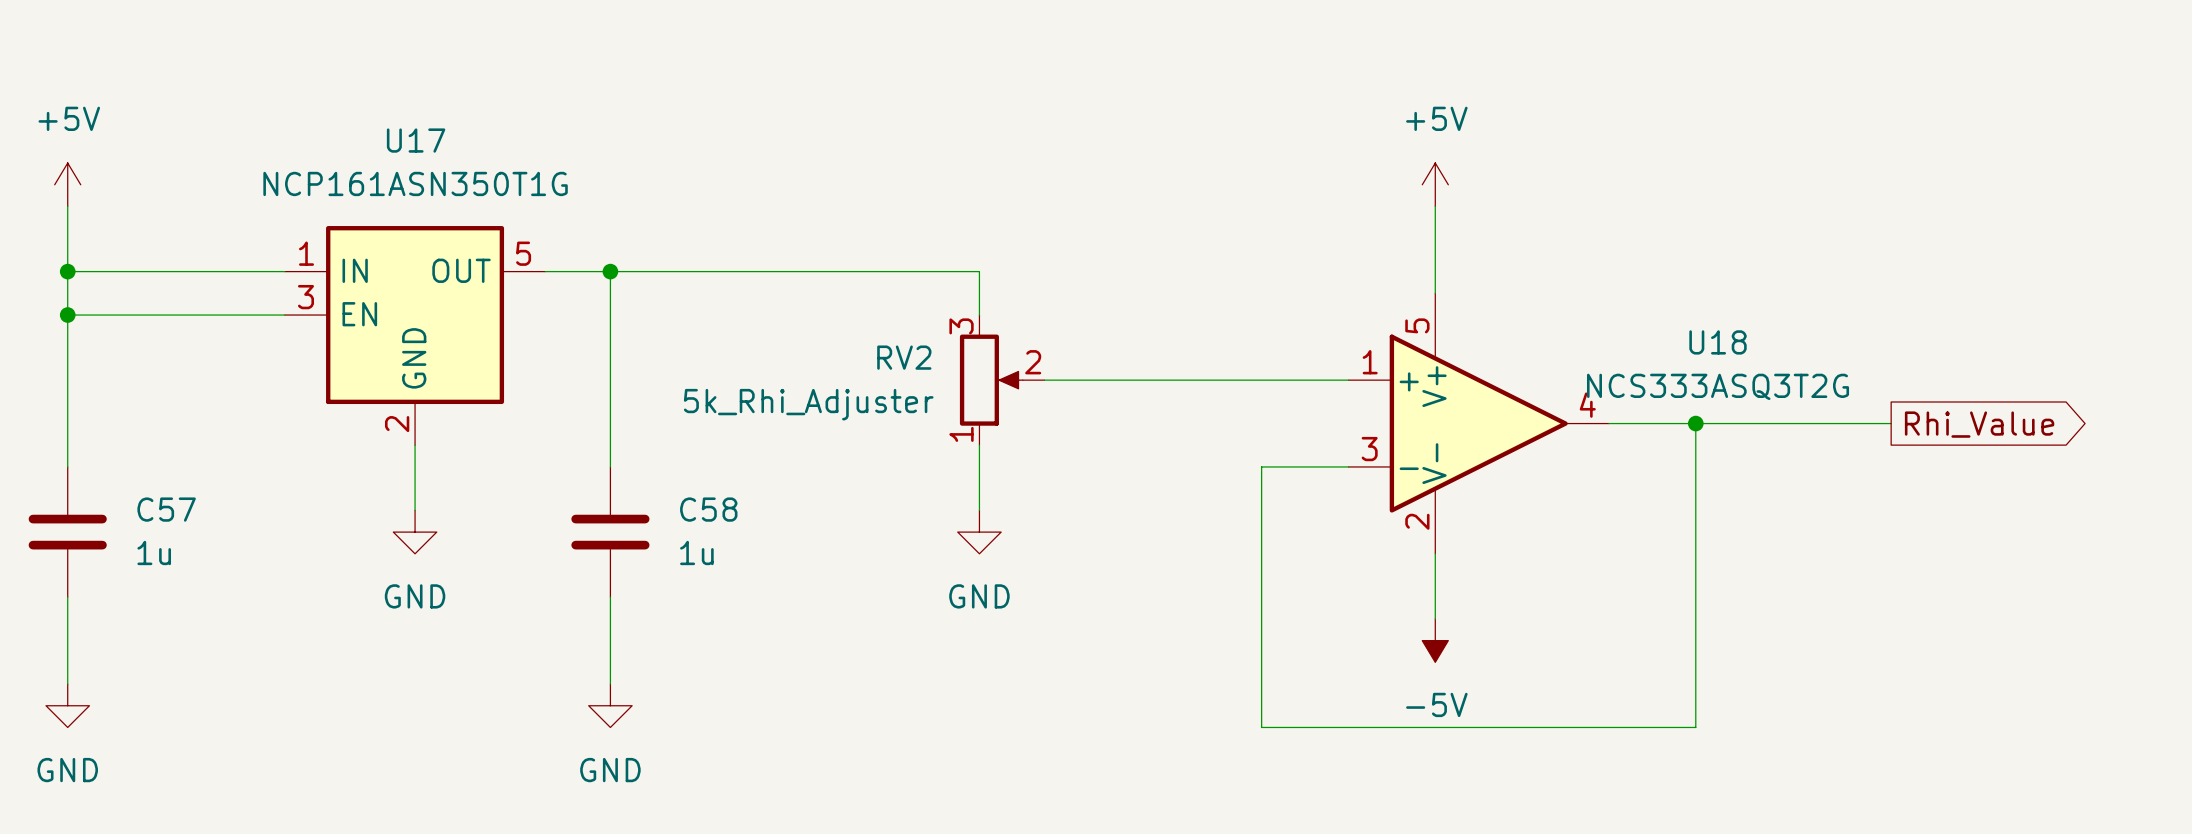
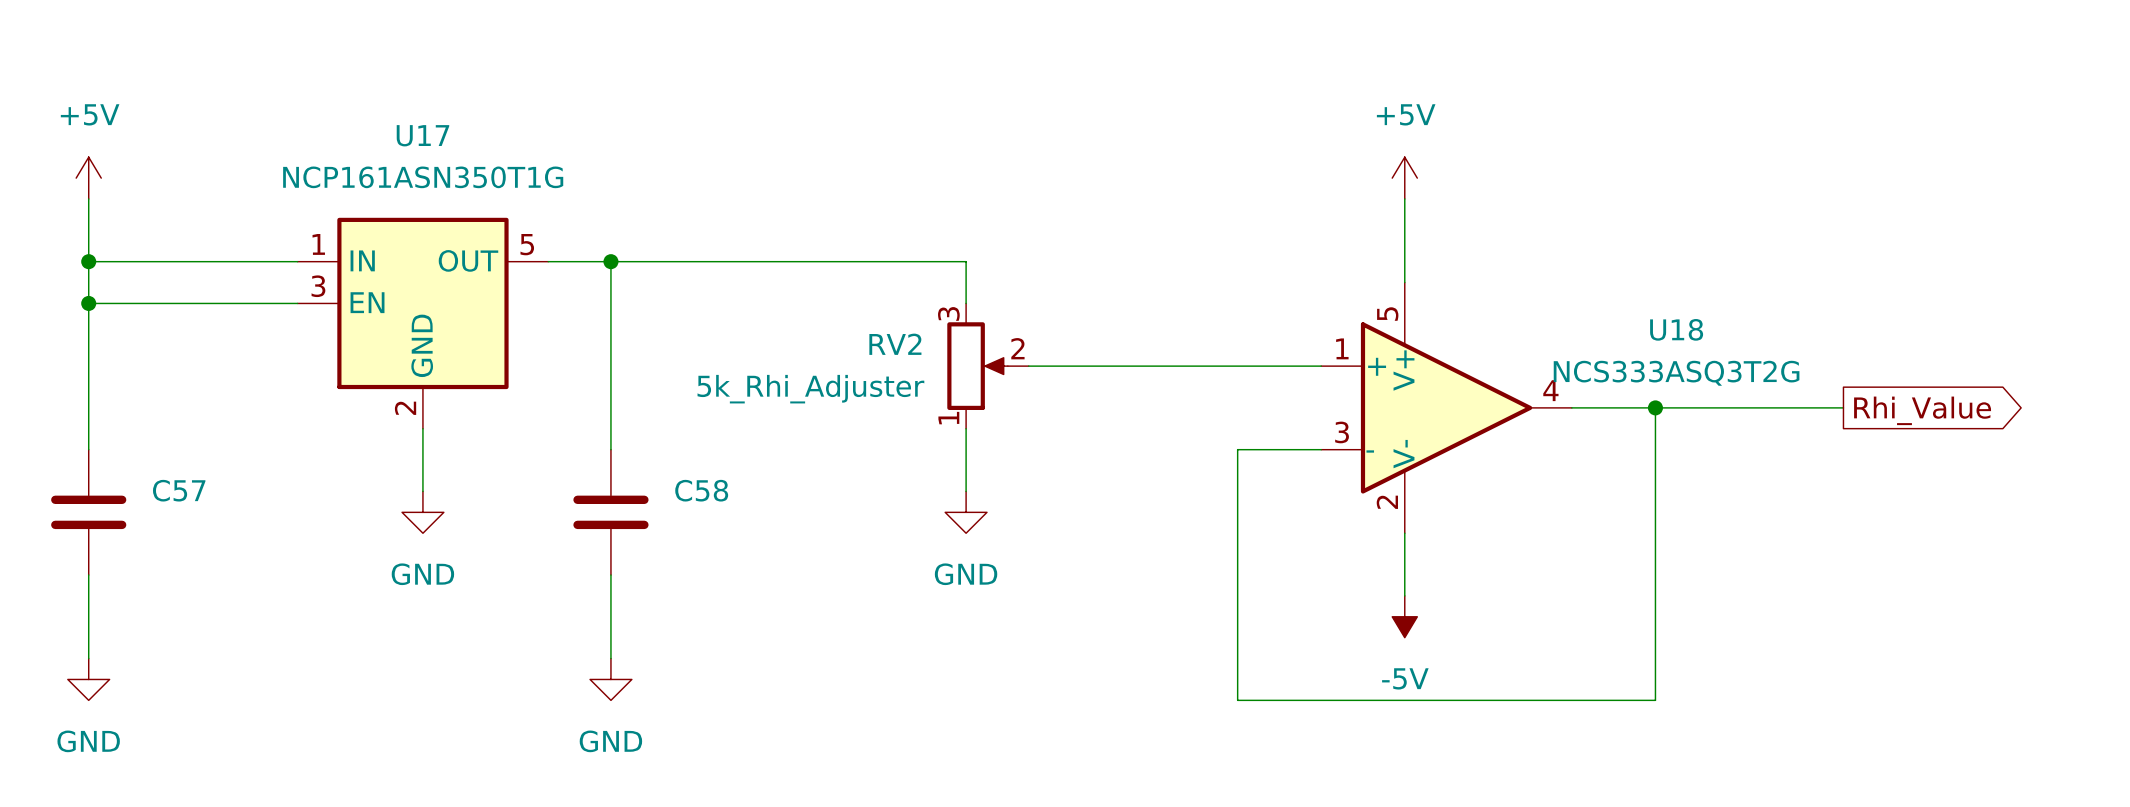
C57 value: 1u (154, 552) -> none
C58 value: 1u (696, 552) -> none

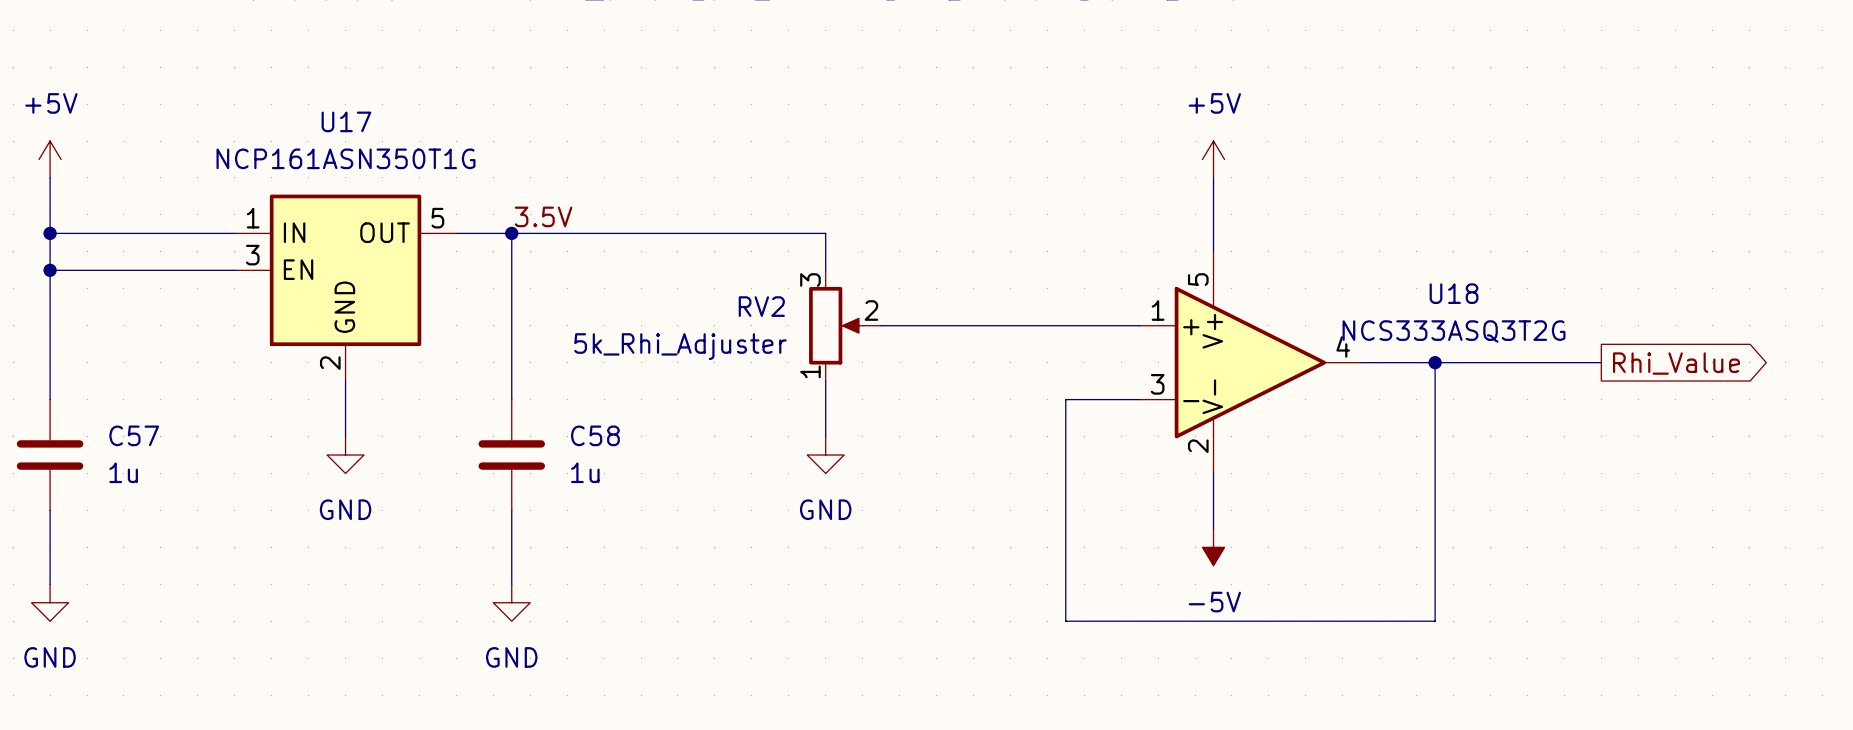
label: none -> 3.5V (543, 216)
C57 value: none -> 1u (123, 472)
C58 value: none -> 1u (585, 472)

